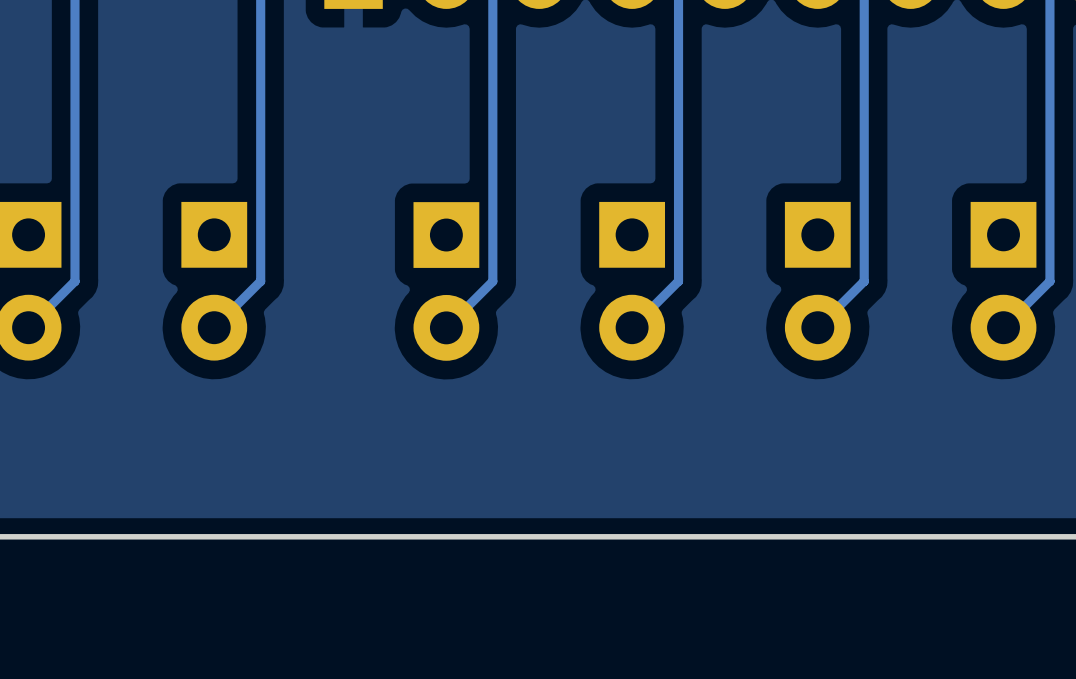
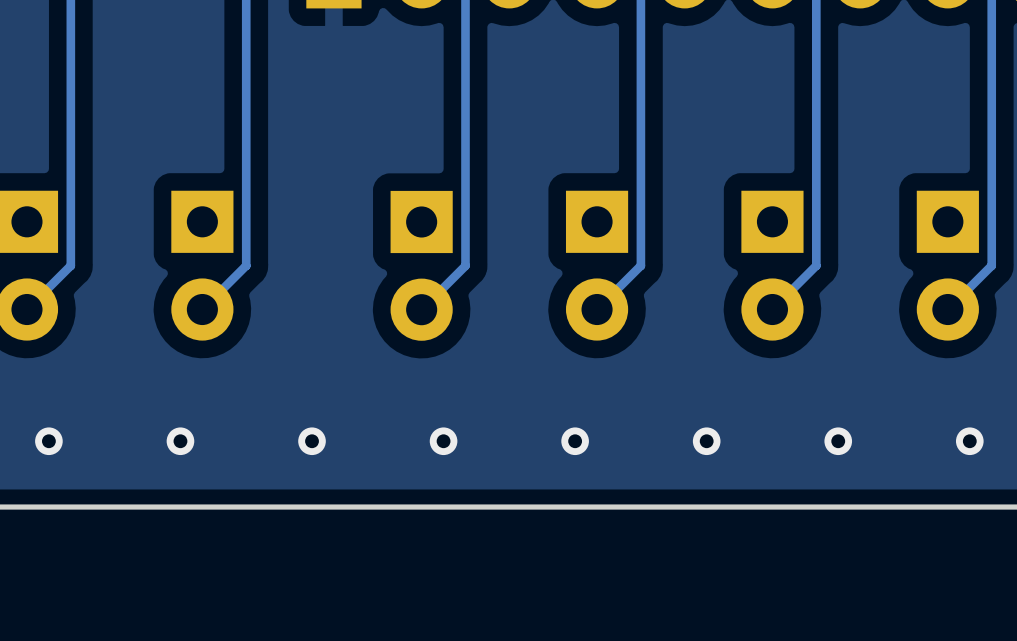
via: none -> (48, 441)
via: none -> (180, 441)
via: none -> (312, 441)
via: none -> (443, 441)
via: none -> (575, 441)
via: none -> (706, 441)
via: none -> (838, 441)
via: none -> (969, 441)

